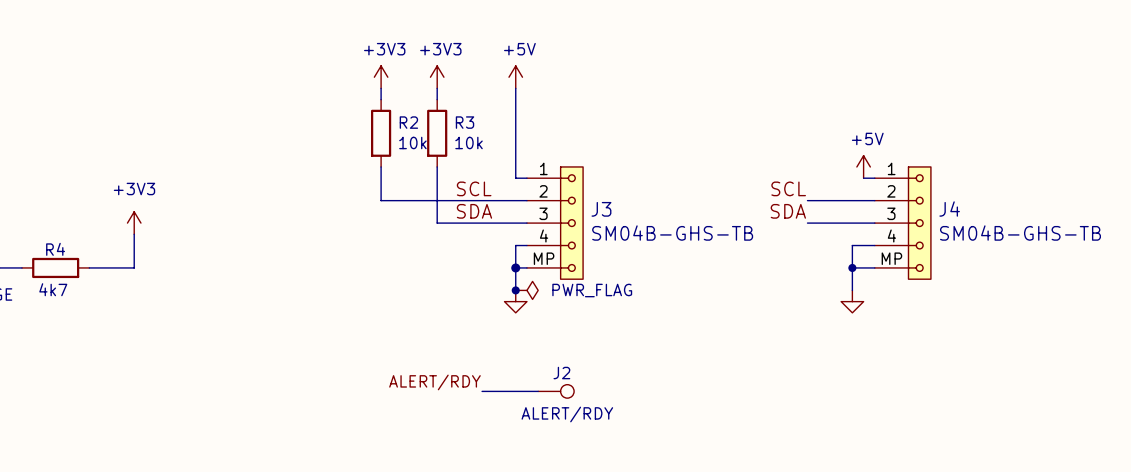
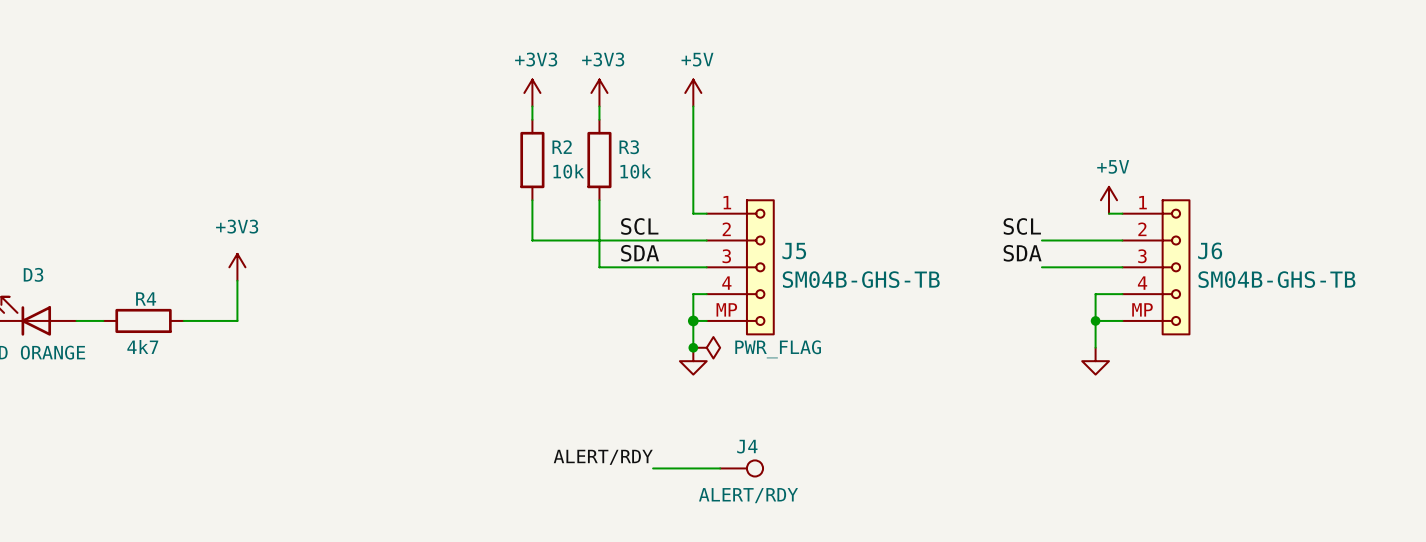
J3 name: J3 (601, 209) -> J5 (794, 251)
J4 name: J4 (949, 209) -> J6 (1210, 250)
J2 name: J2 (561, 373) -> J4 (747, 446)

